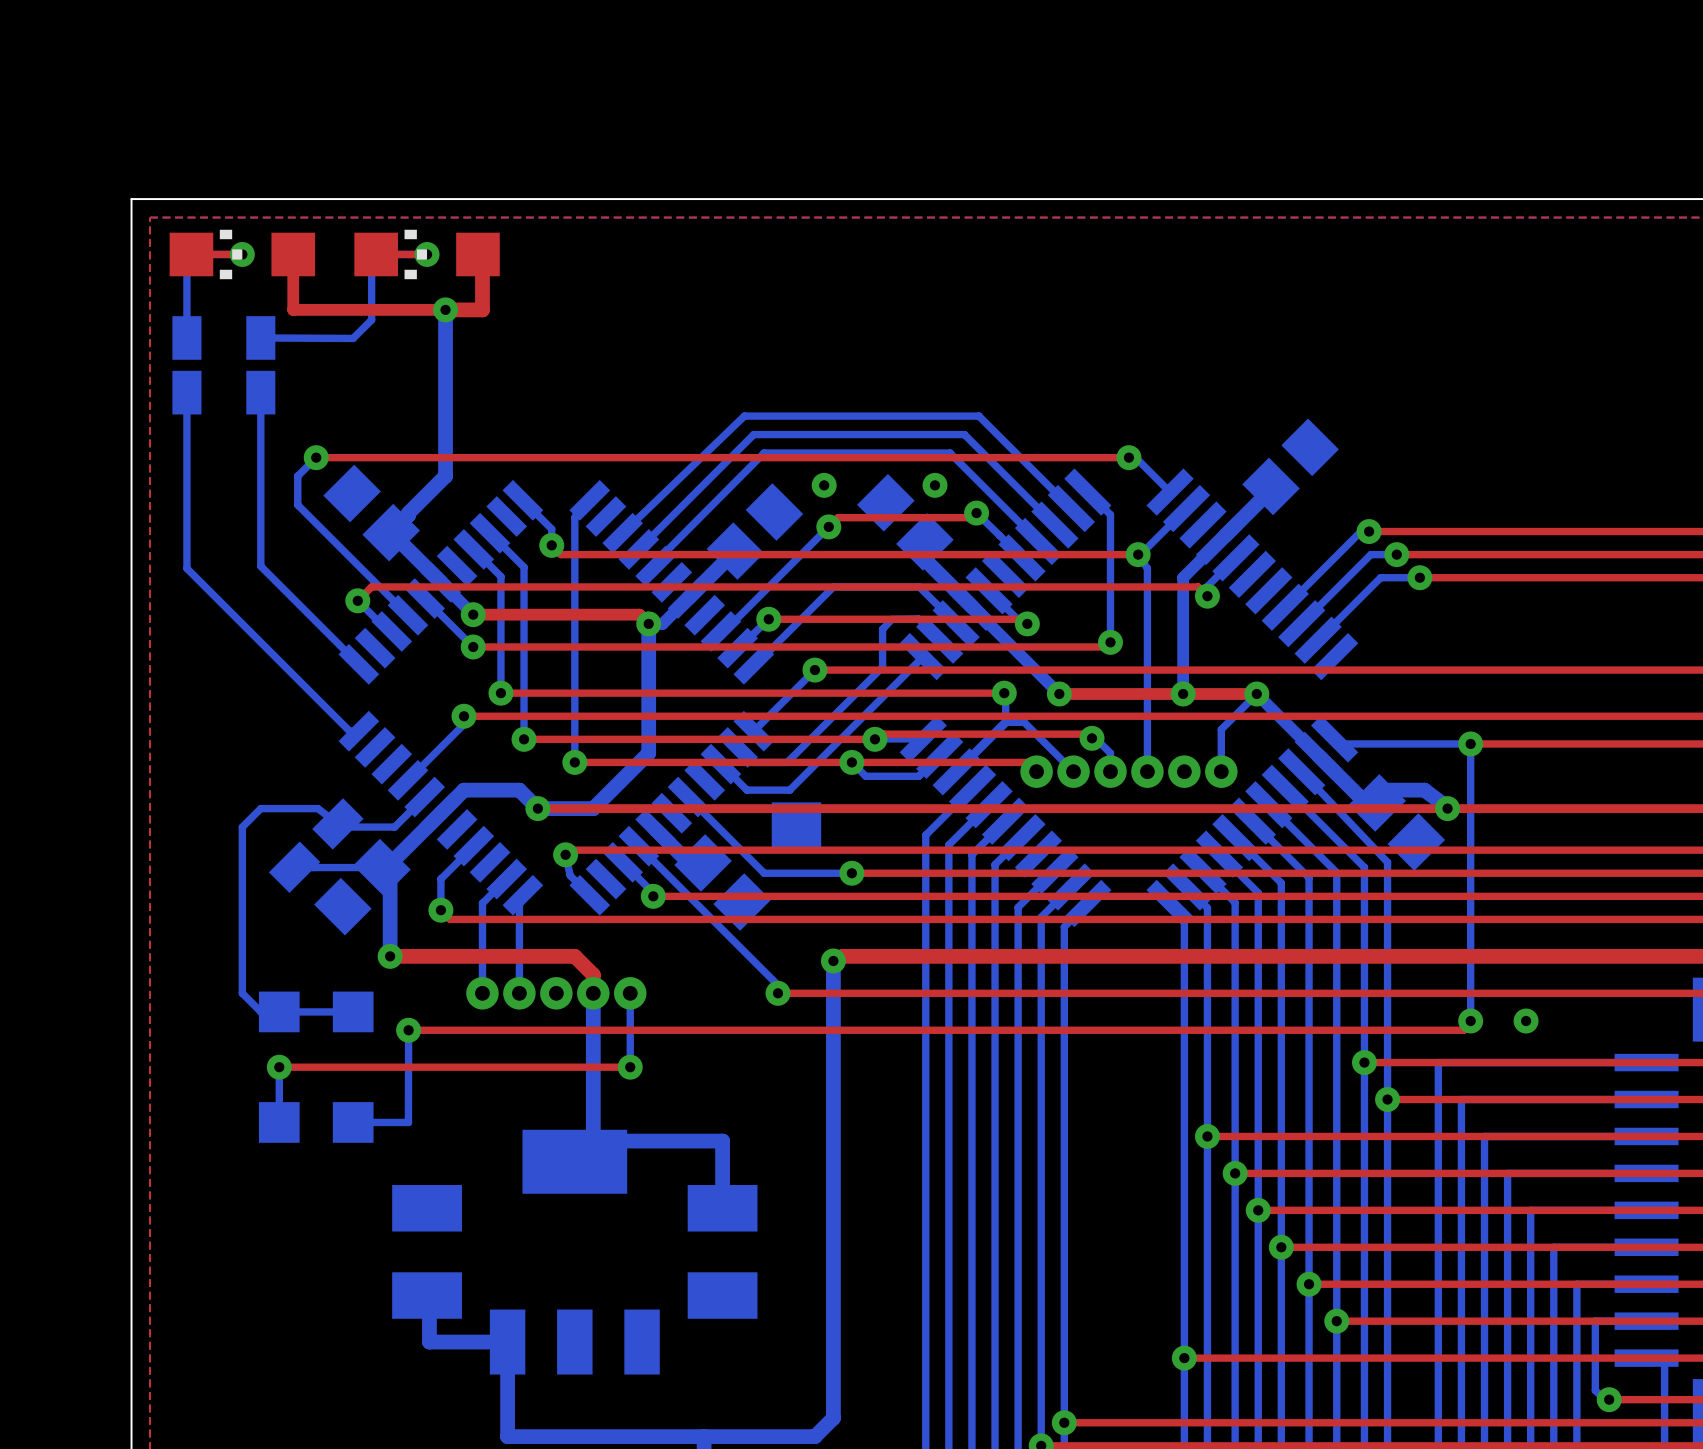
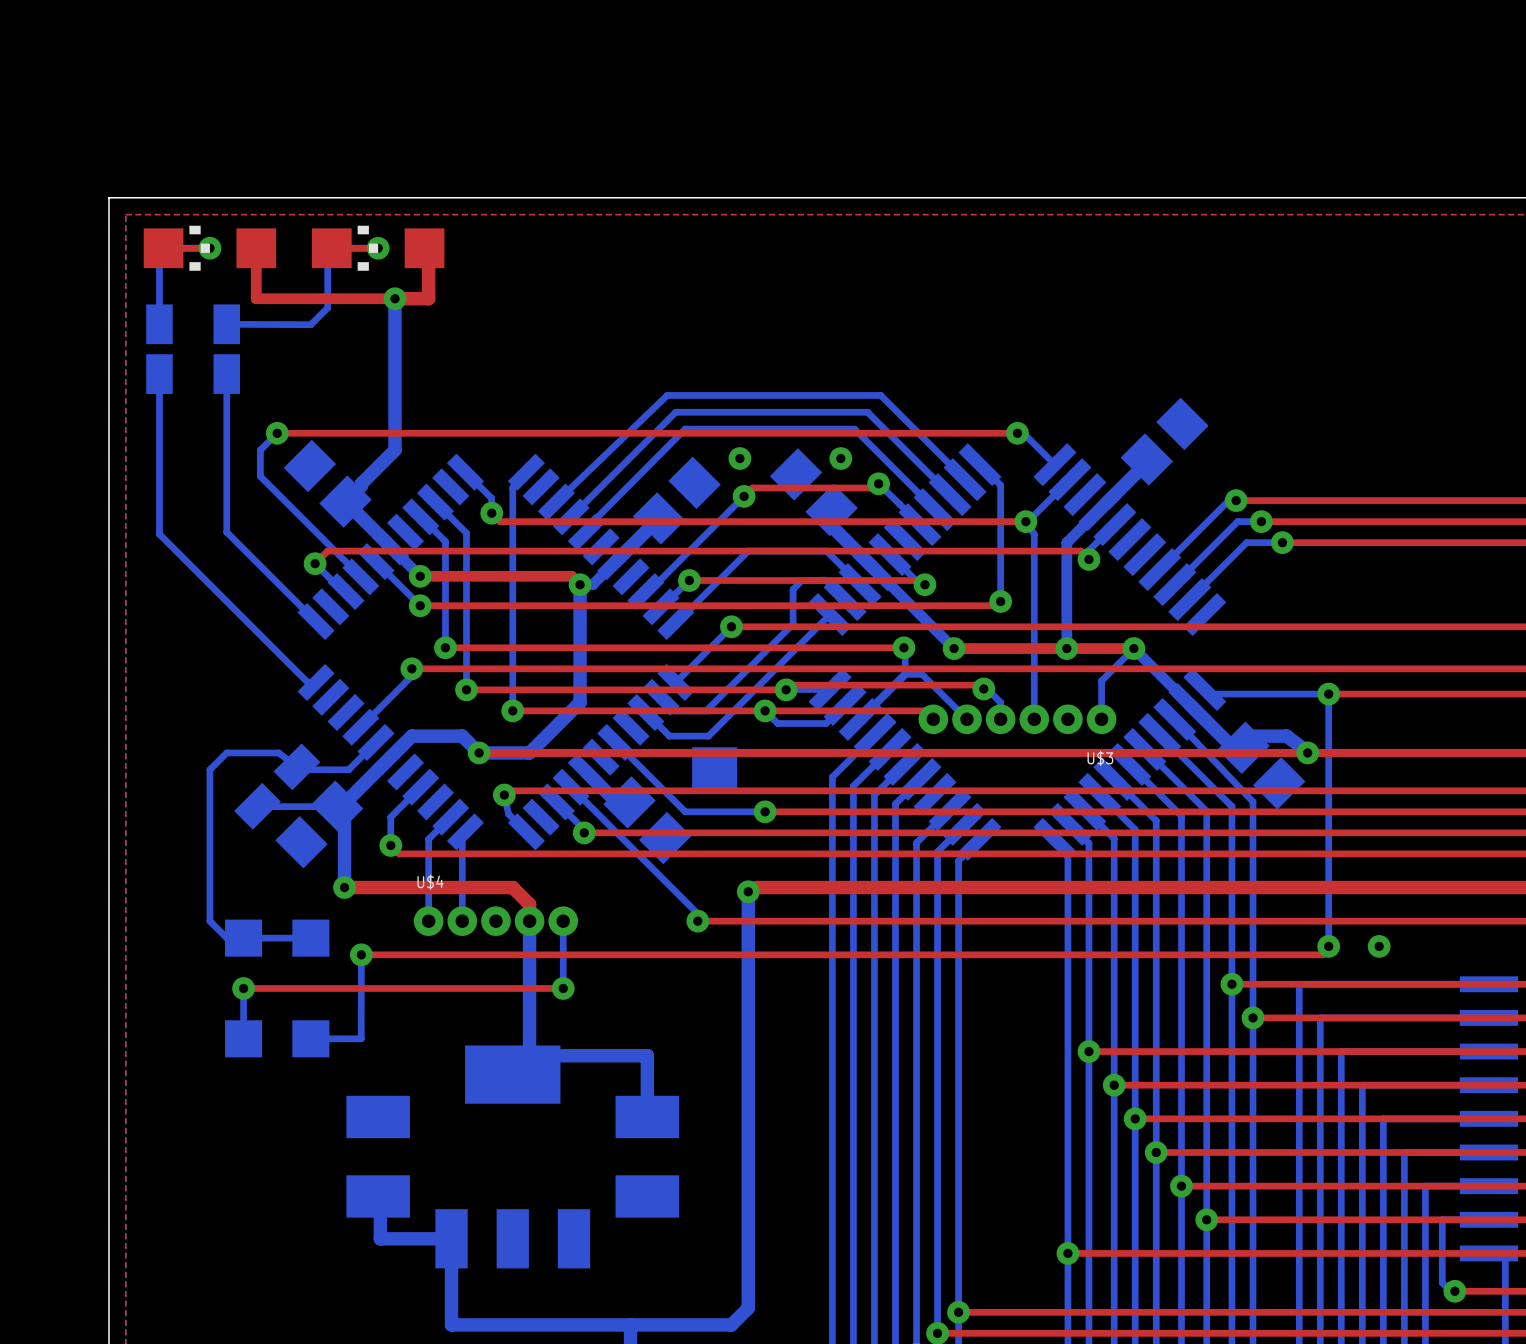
U$3 name: none -> U$3 (1100, 758)
U$4 name: none -> U$4 (430, 882)

